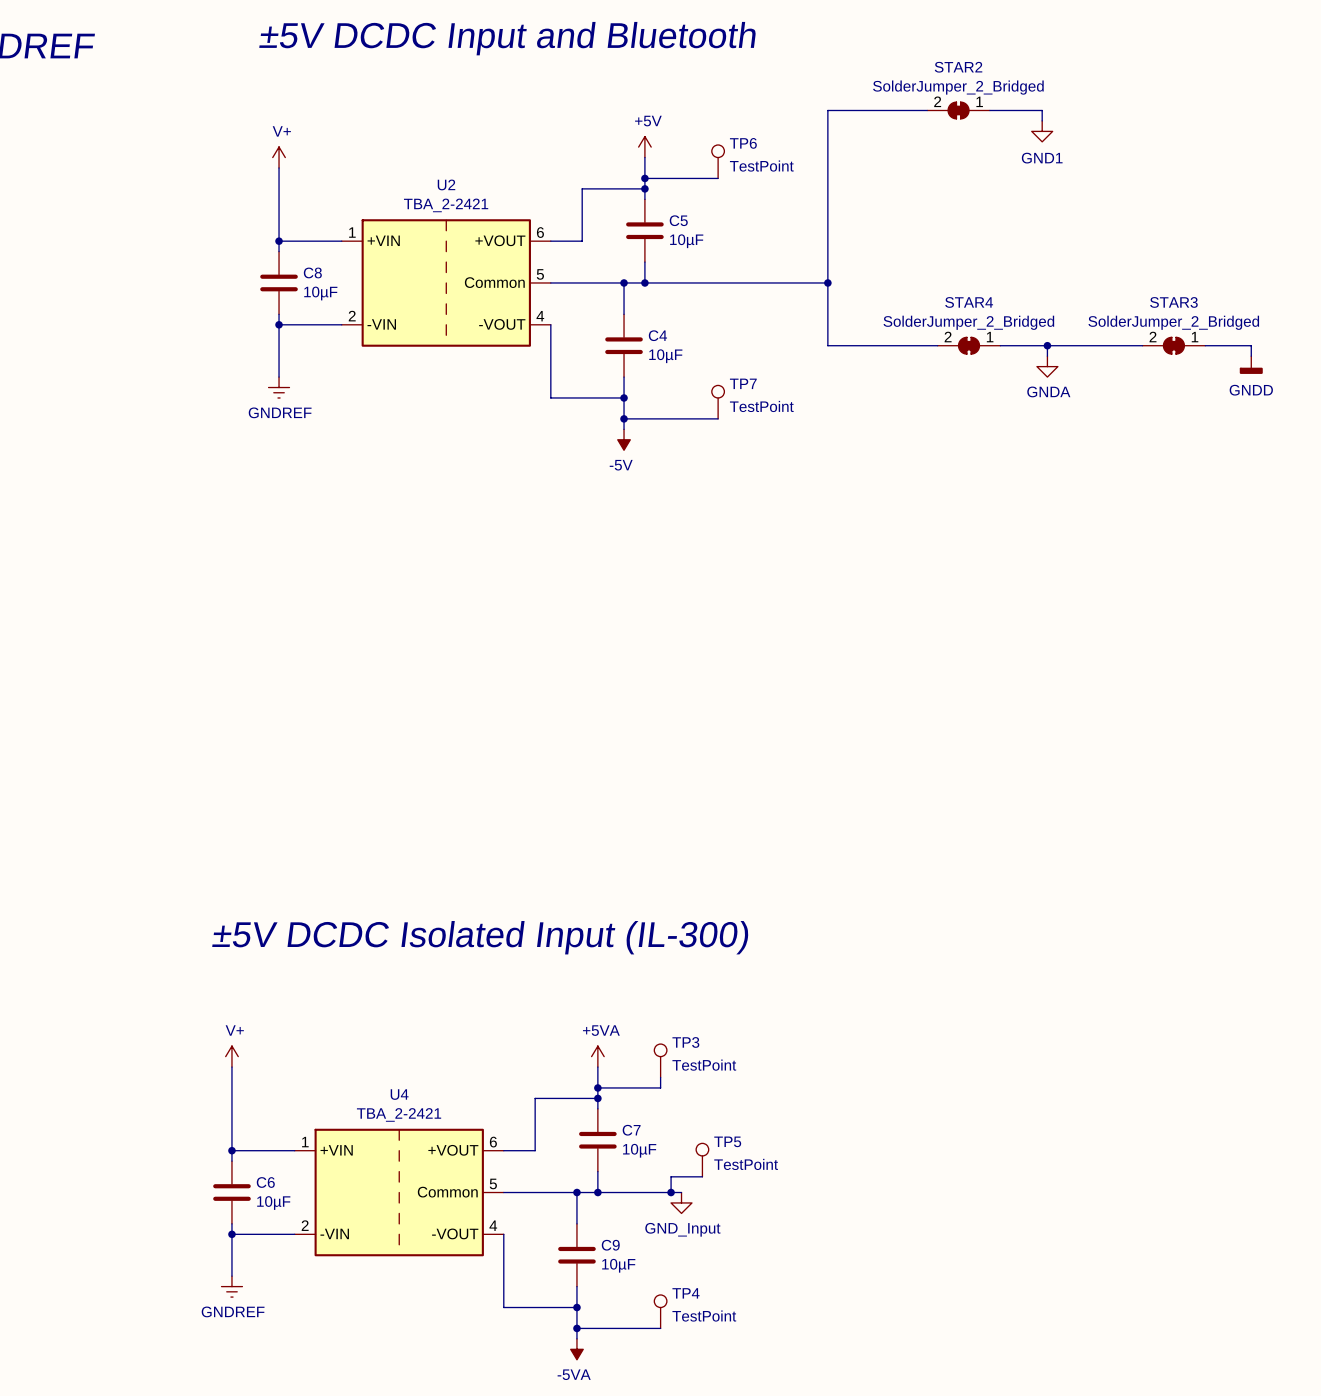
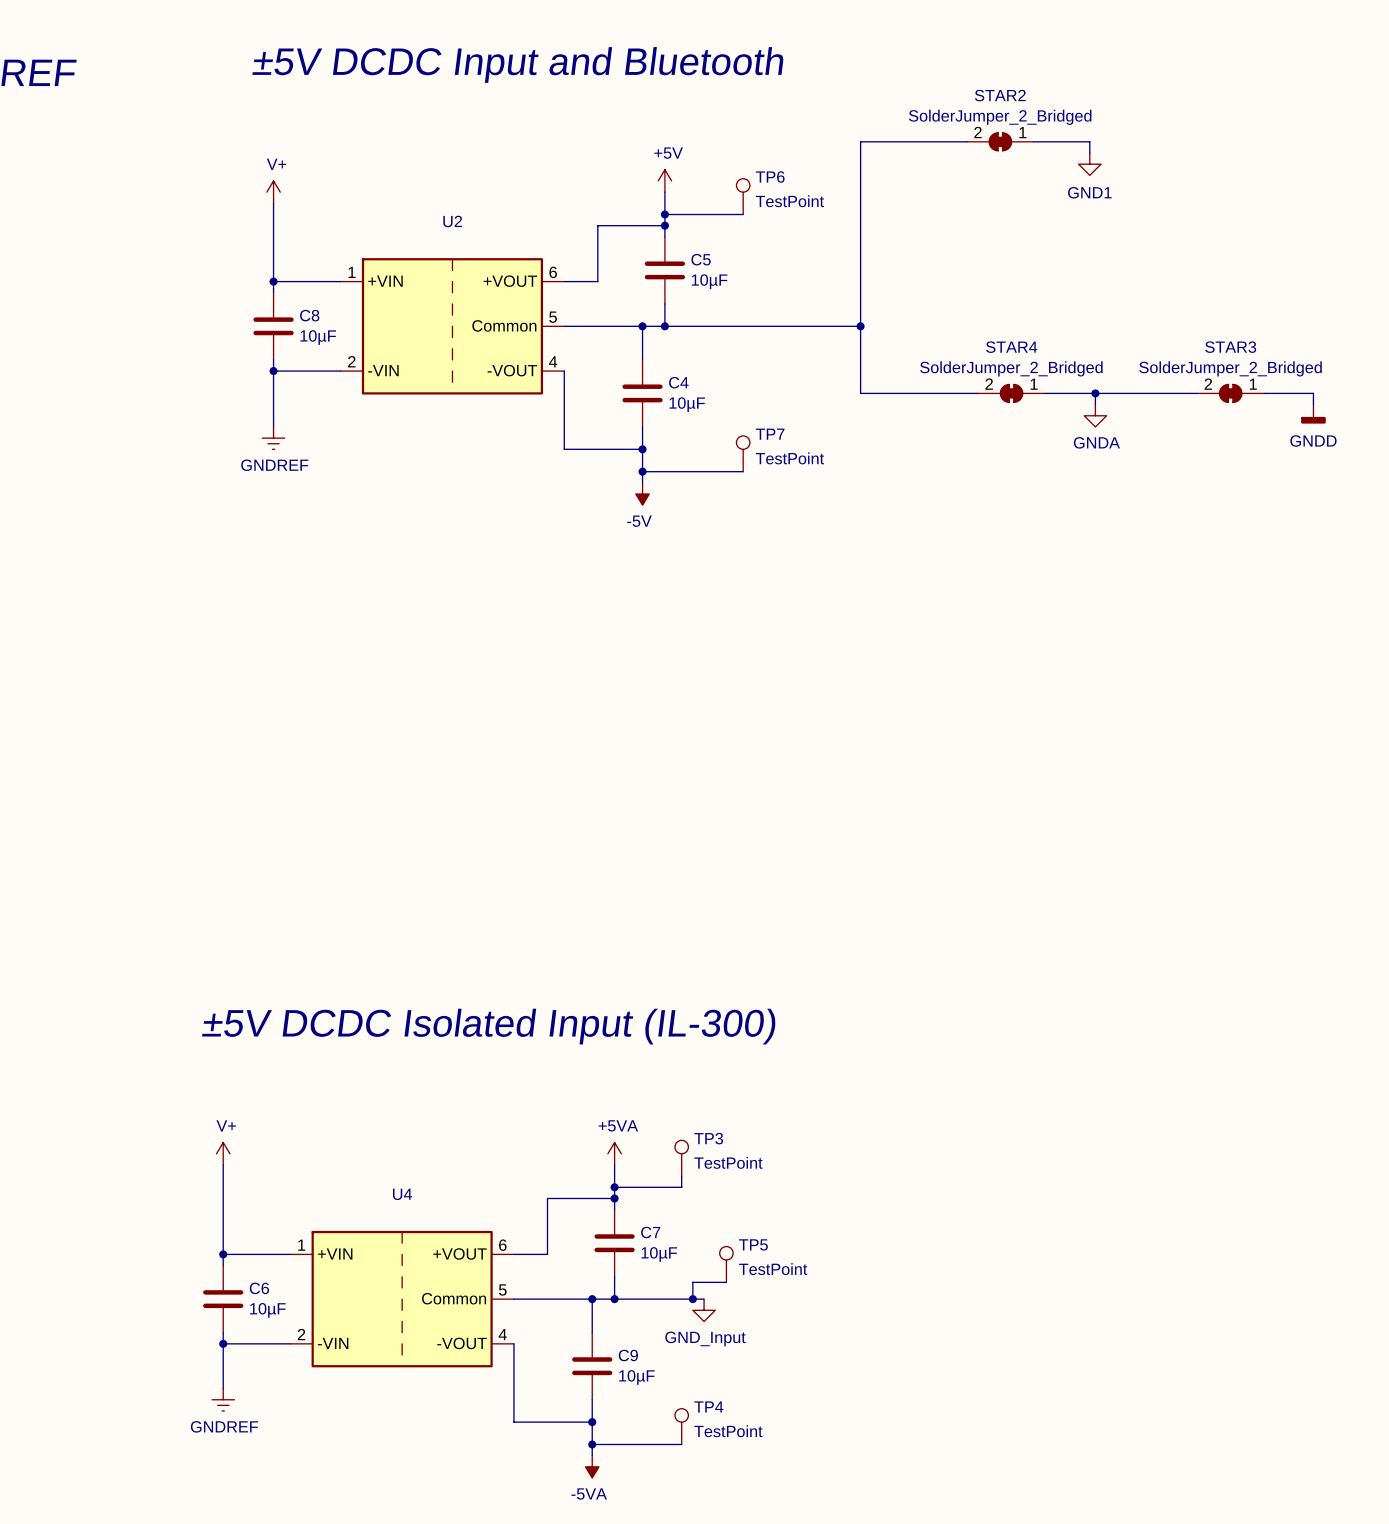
U2 value: TBA_2-2421 (446, 205) -> none
U4 value: TBA_2-2421 (399, 1114) -> none

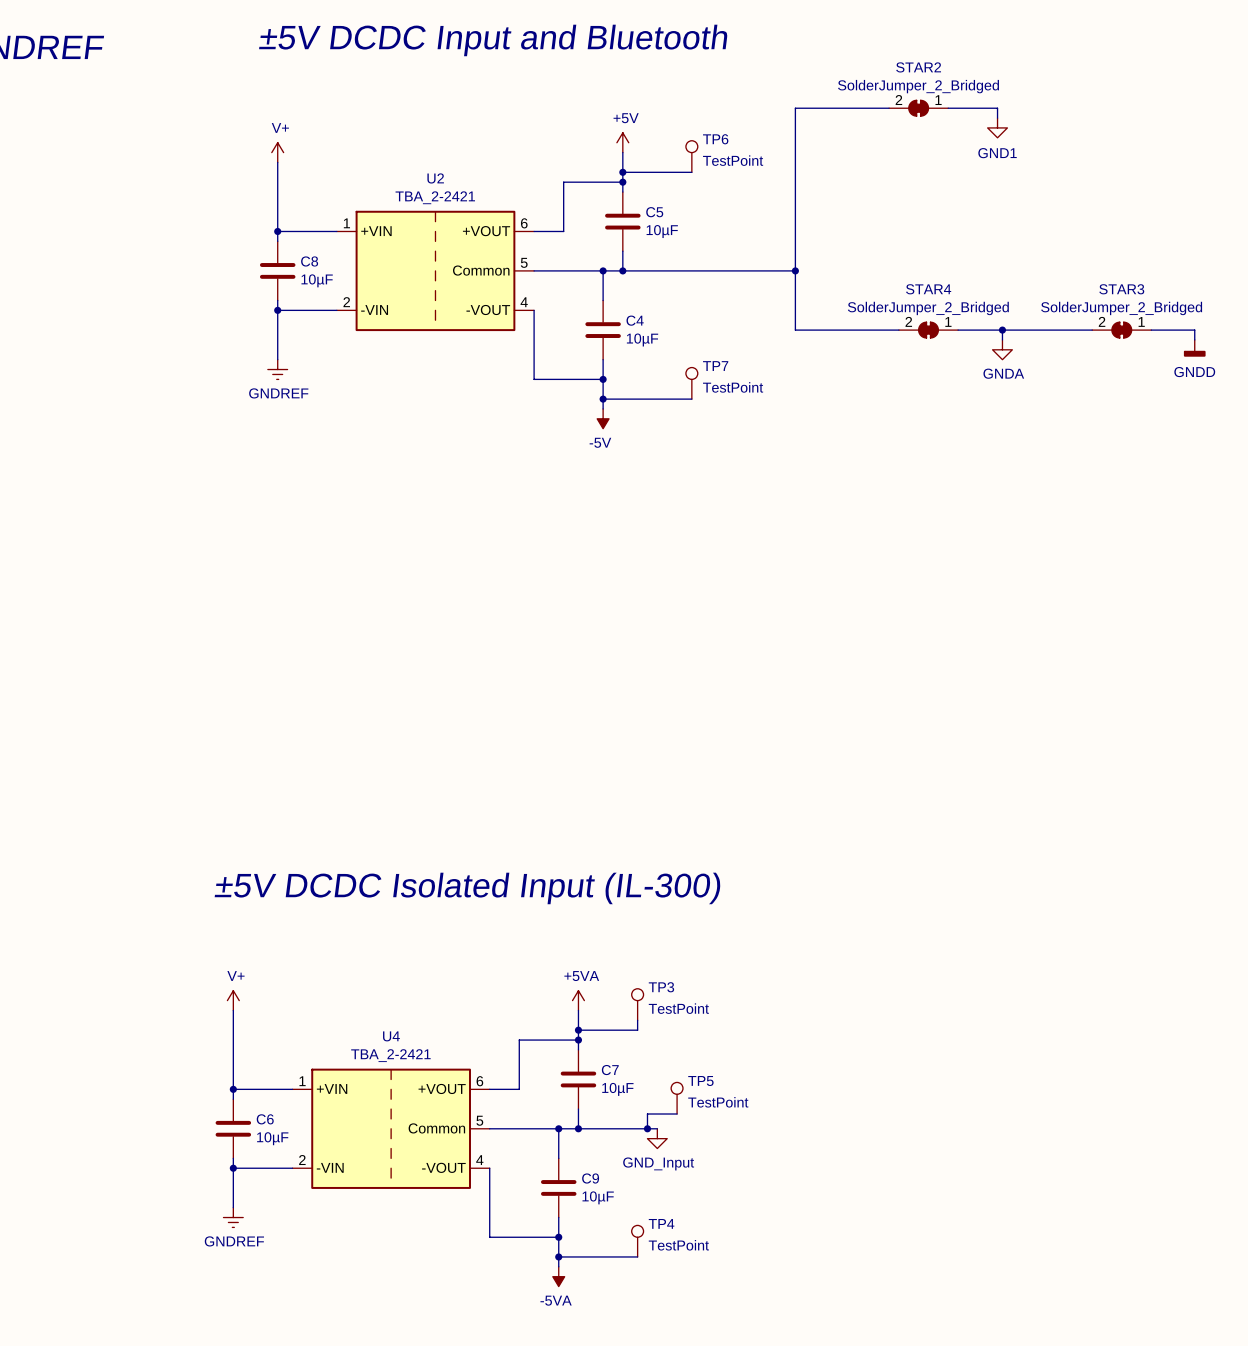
U2 value: none -> TBA_2-2421 (435, 197)
U4 value: none -> TBA_2-2421 (390, 1055)

